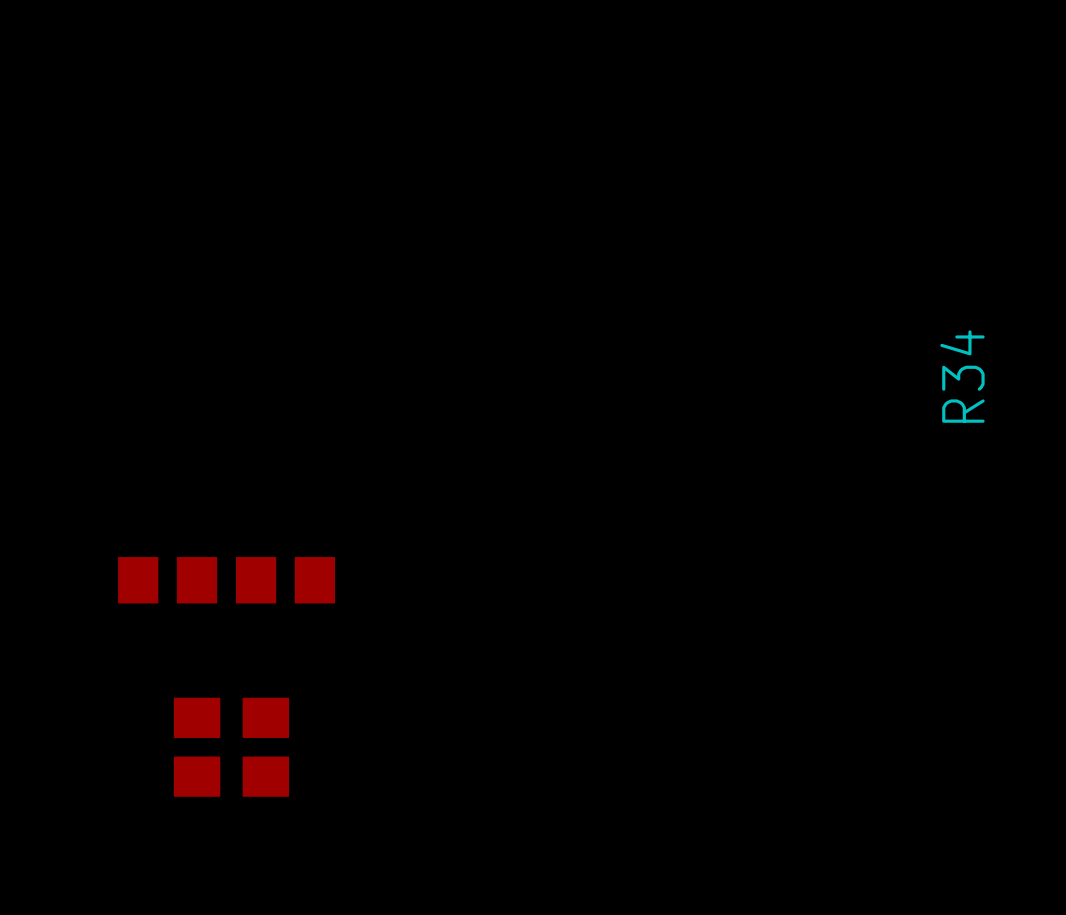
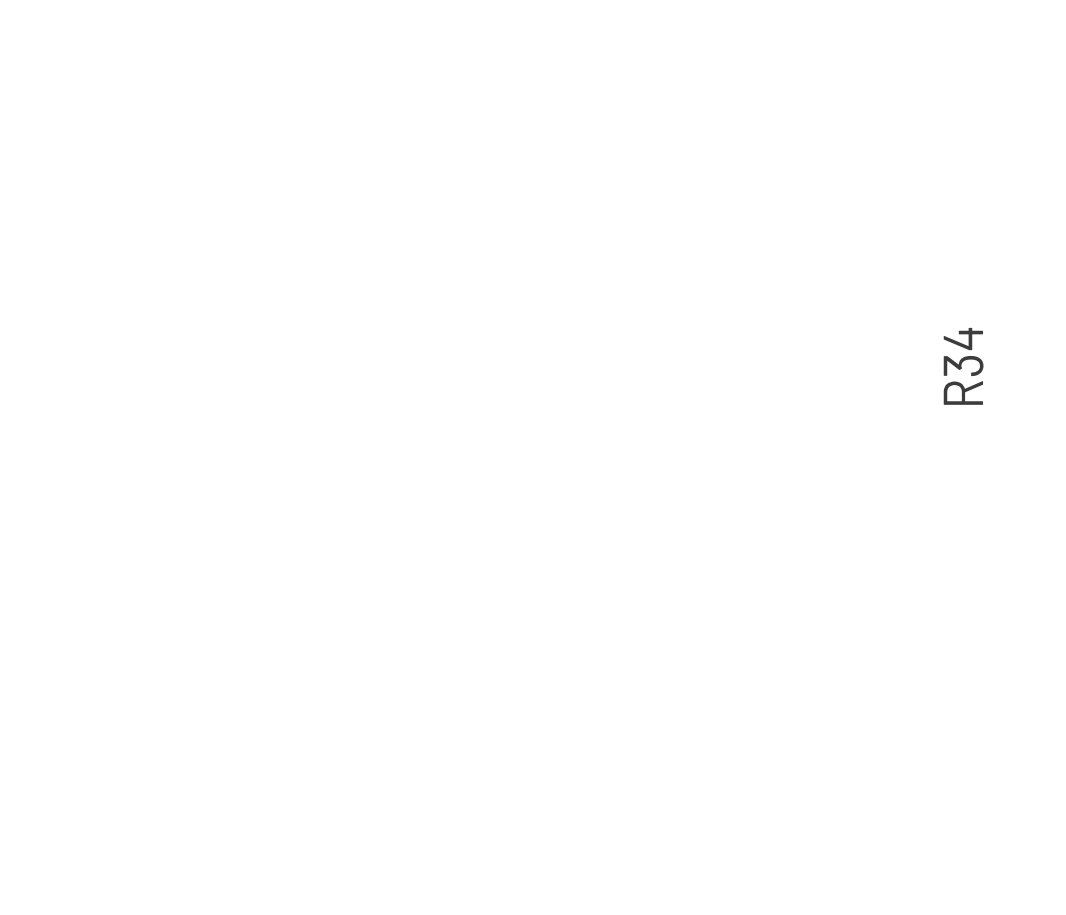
part: (167, 580) -> none
part: (285, 580) -> none
part: (197, 747) -> none
part: (265, 747) -> none

